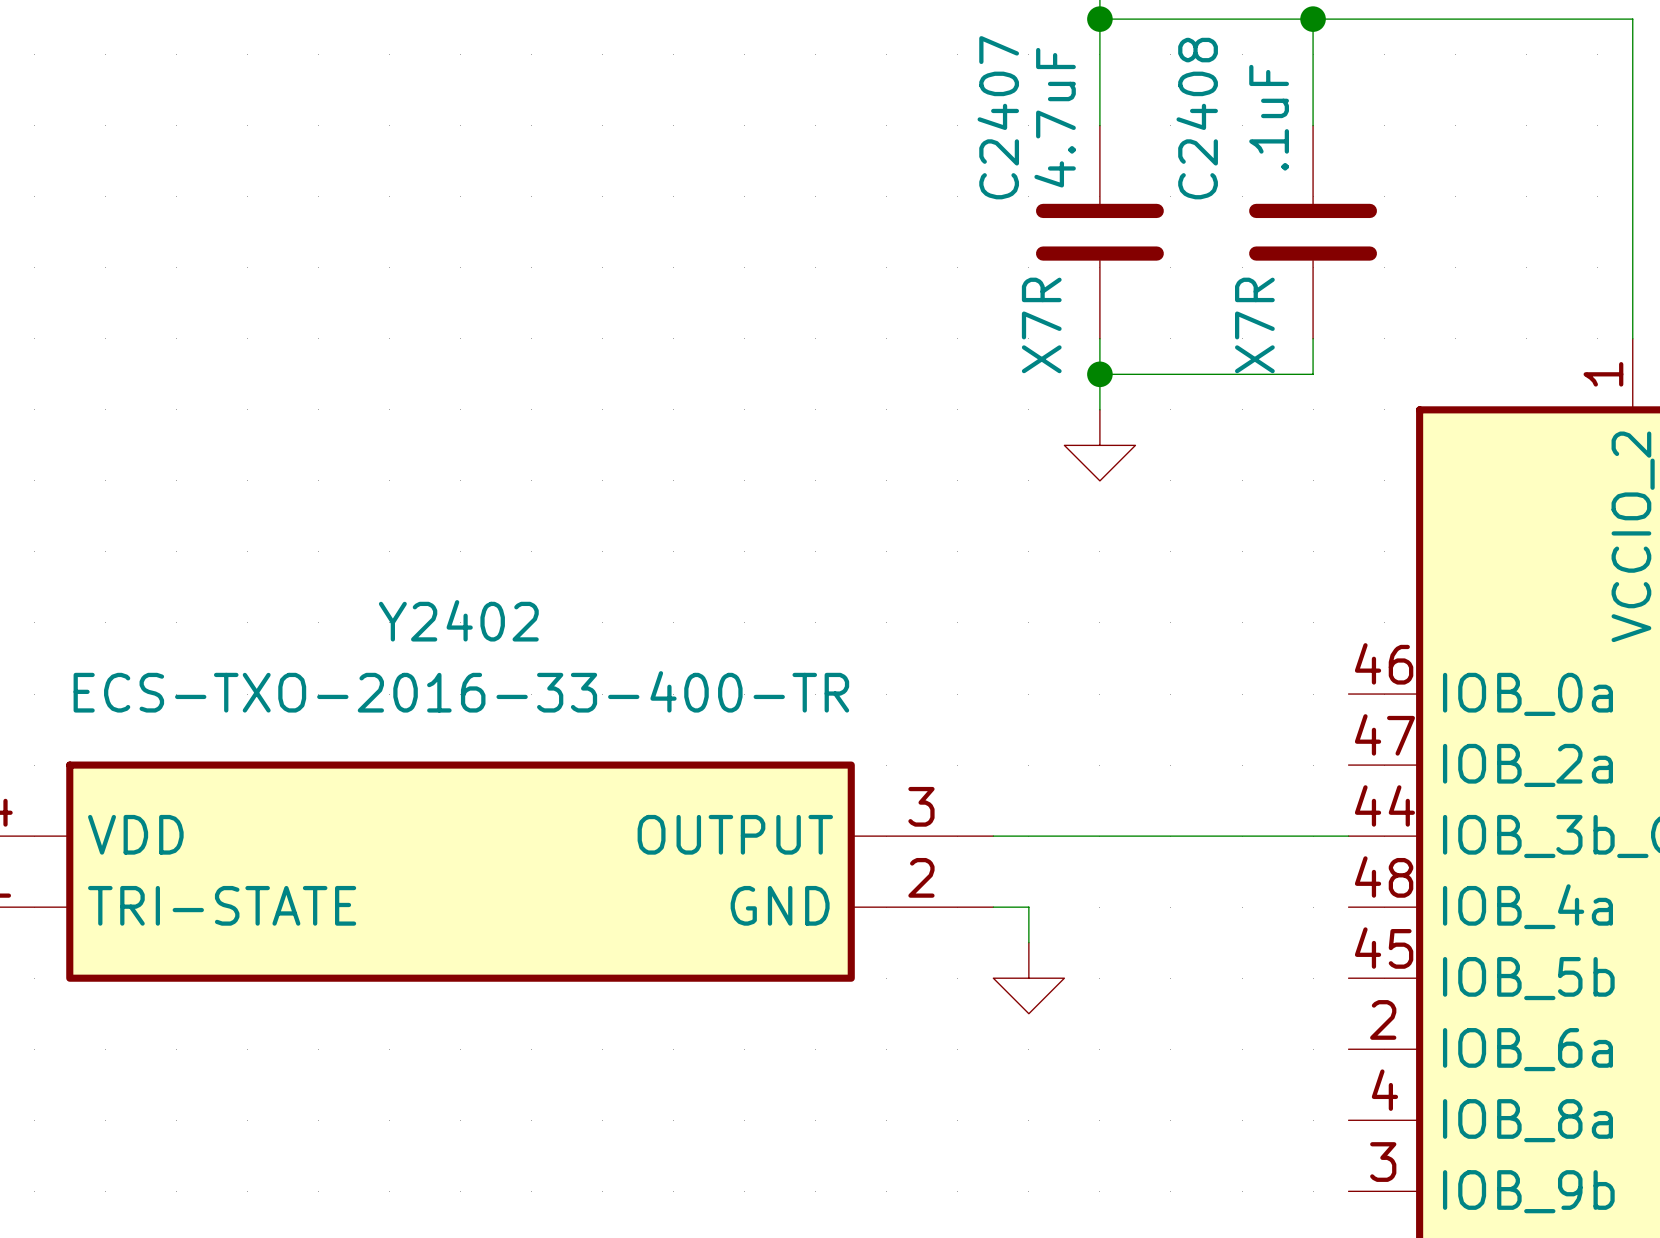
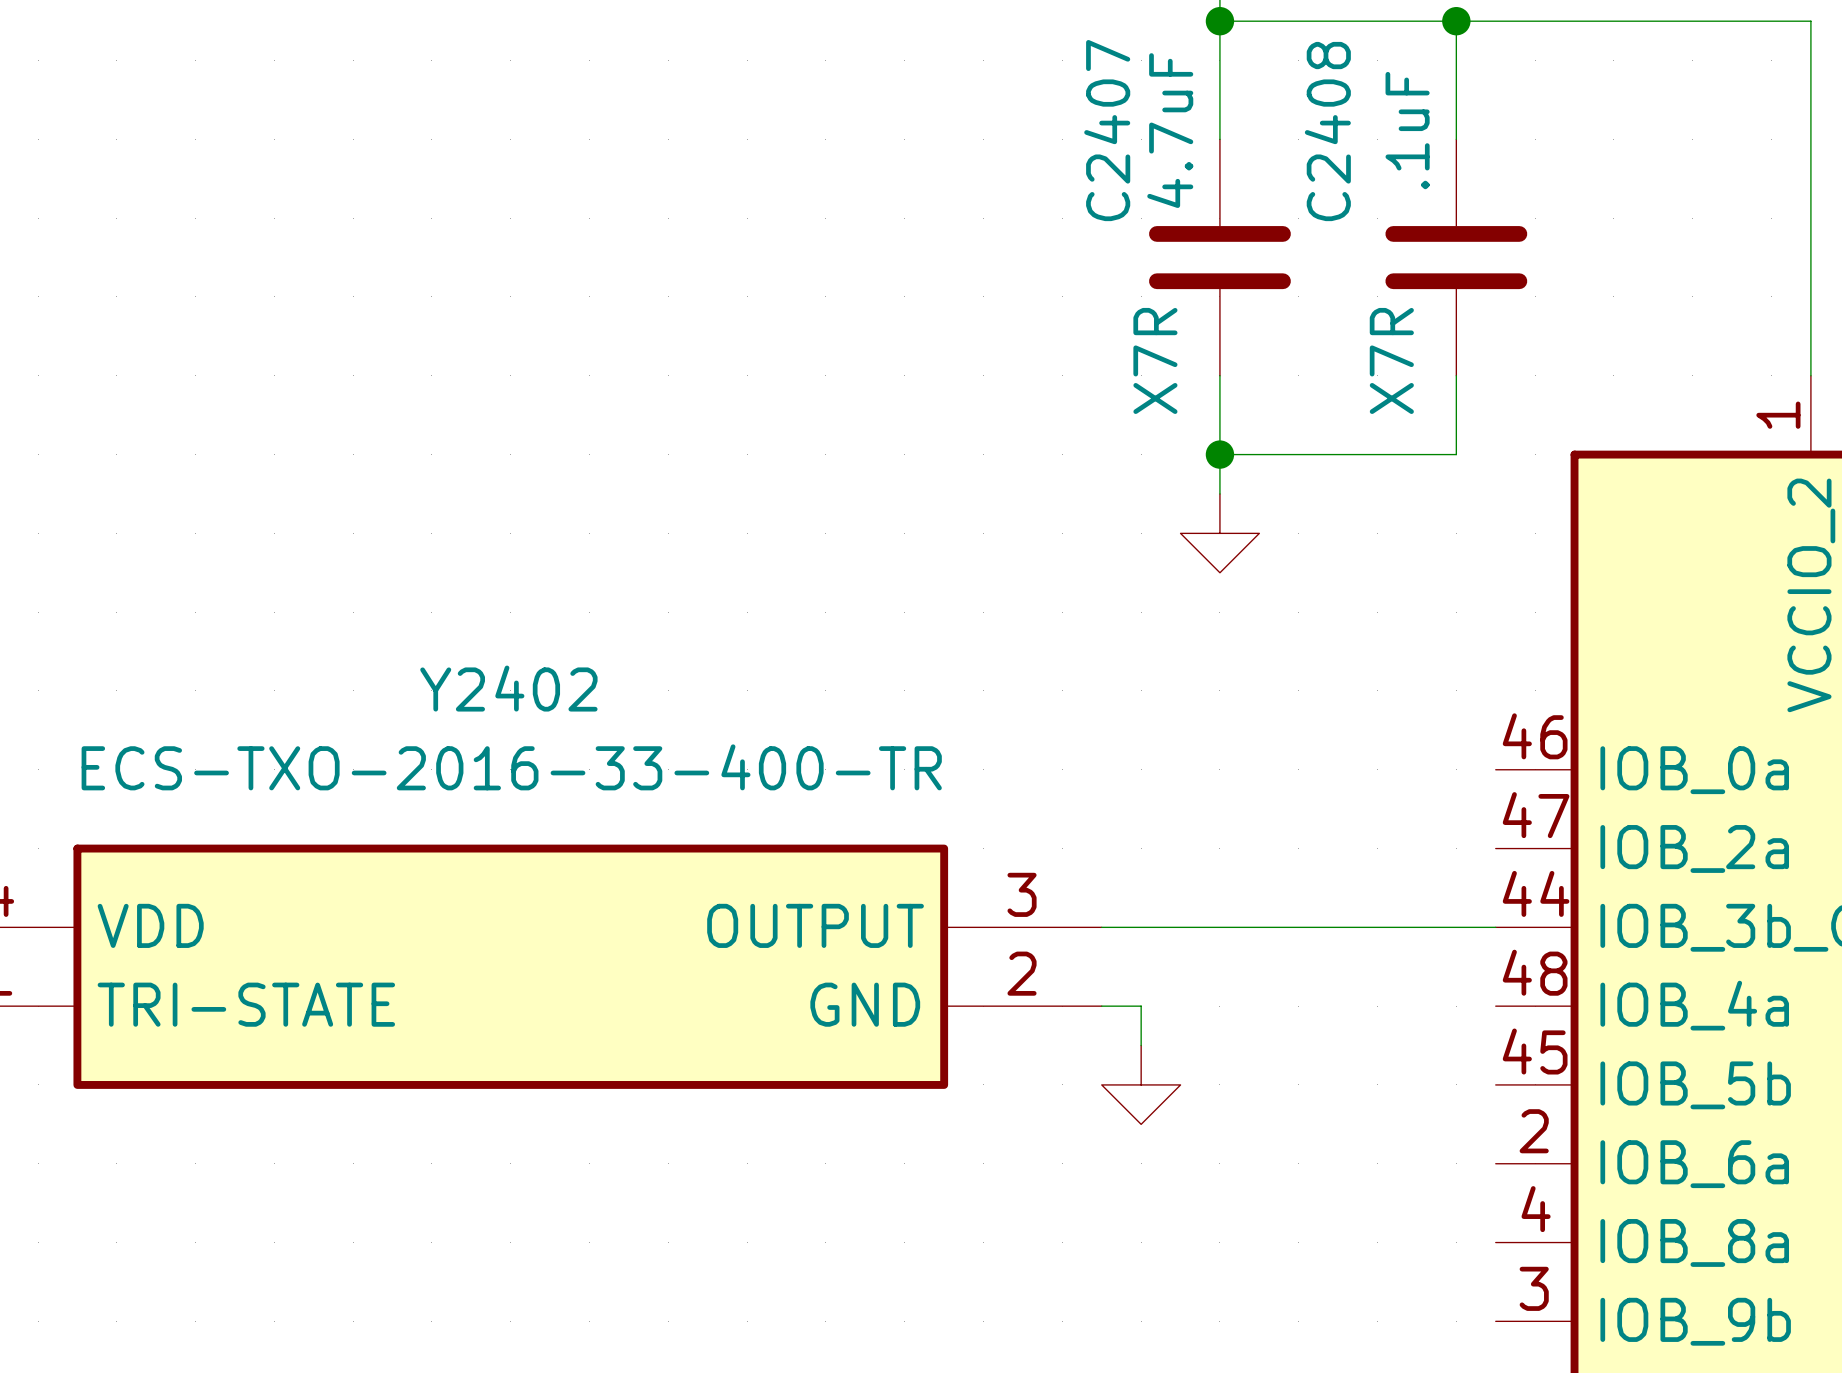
wire: (1099, 374) (1313, 374) -> (1219, 493) (1219, 454) (1456, 454) (1456, 415)
junction position: (1099, 374) -> (1219, 454)
power symbol position: (1099, 445) -> (1219, 533)

